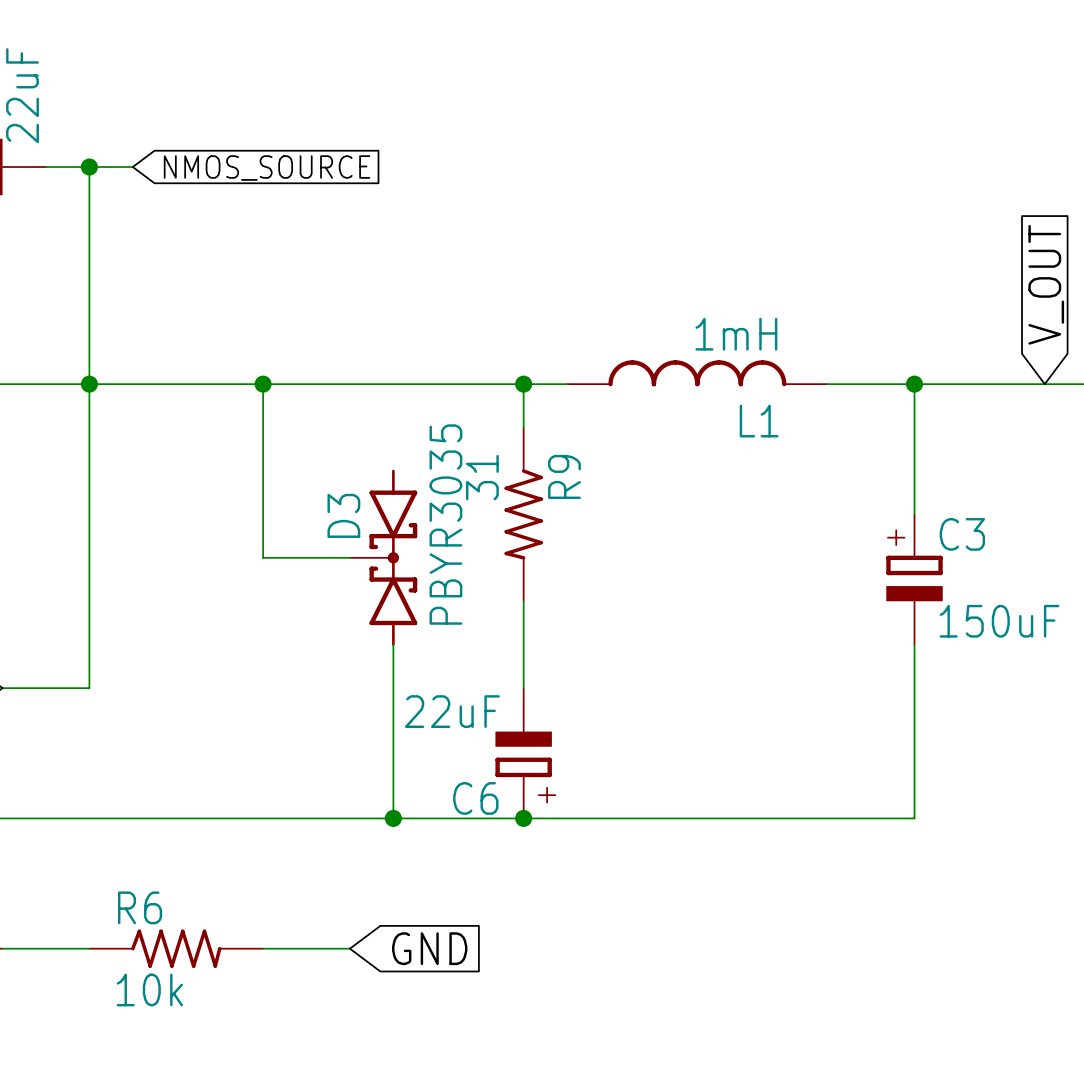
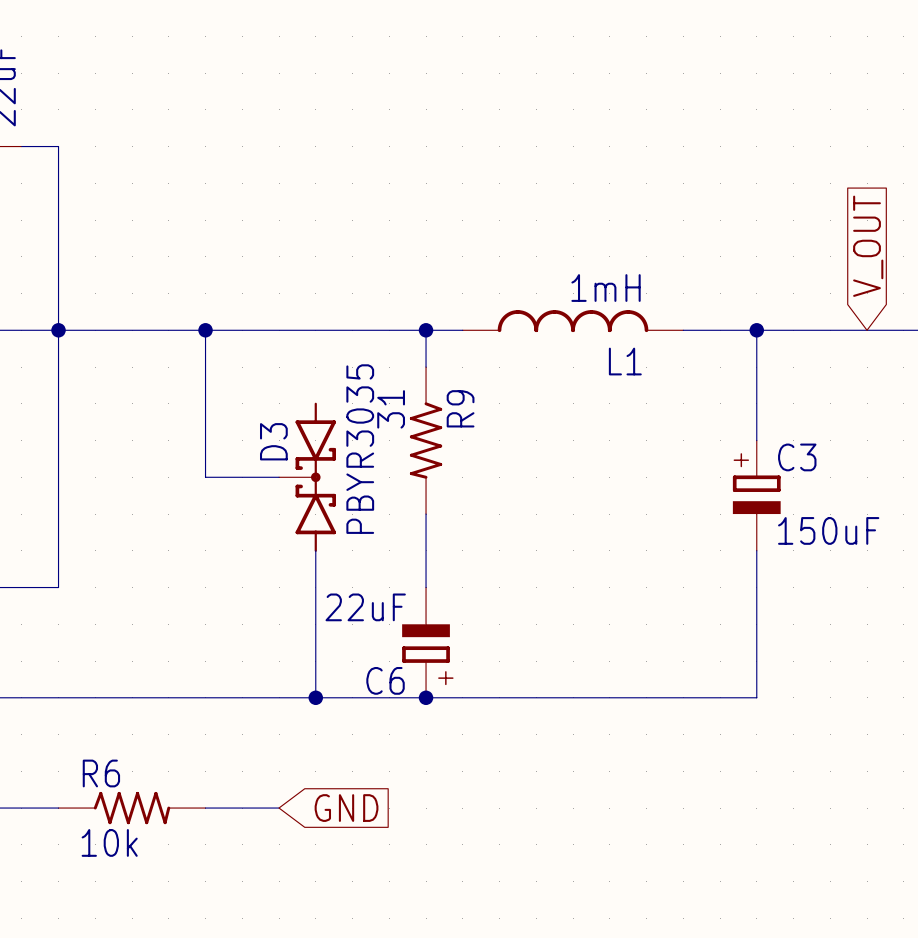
wire: (89, 167) (132, 167) -> none
junction: (89, 167) -> none
global label: NMOS_SOURCE (267, 168) -> none

